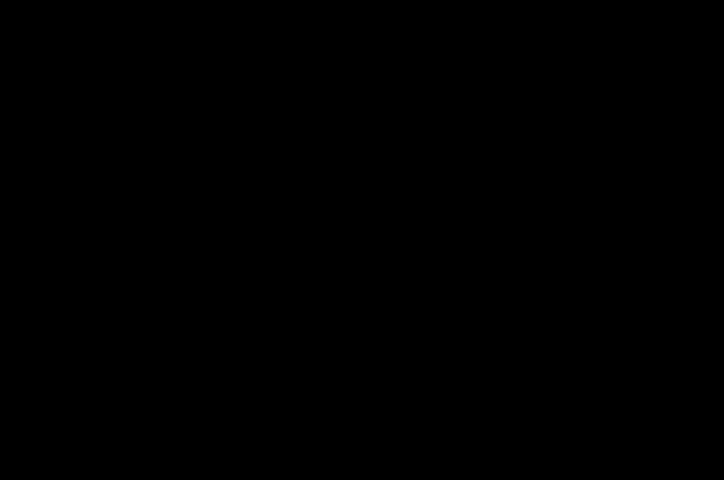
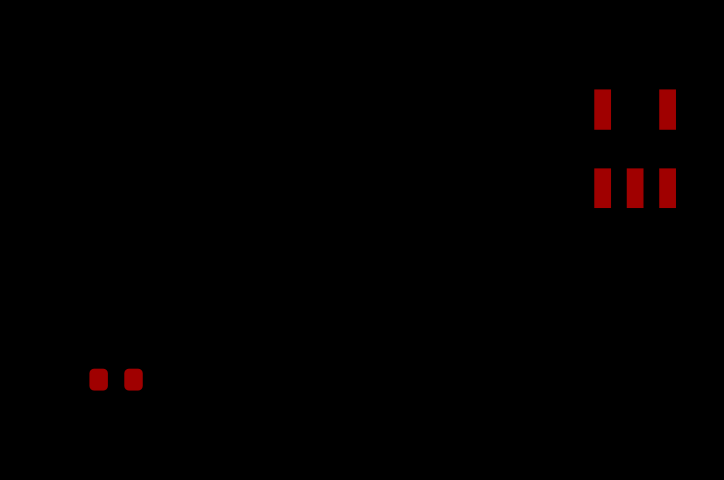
part: none -> (635, 148)
part: none -> (116, 379)

